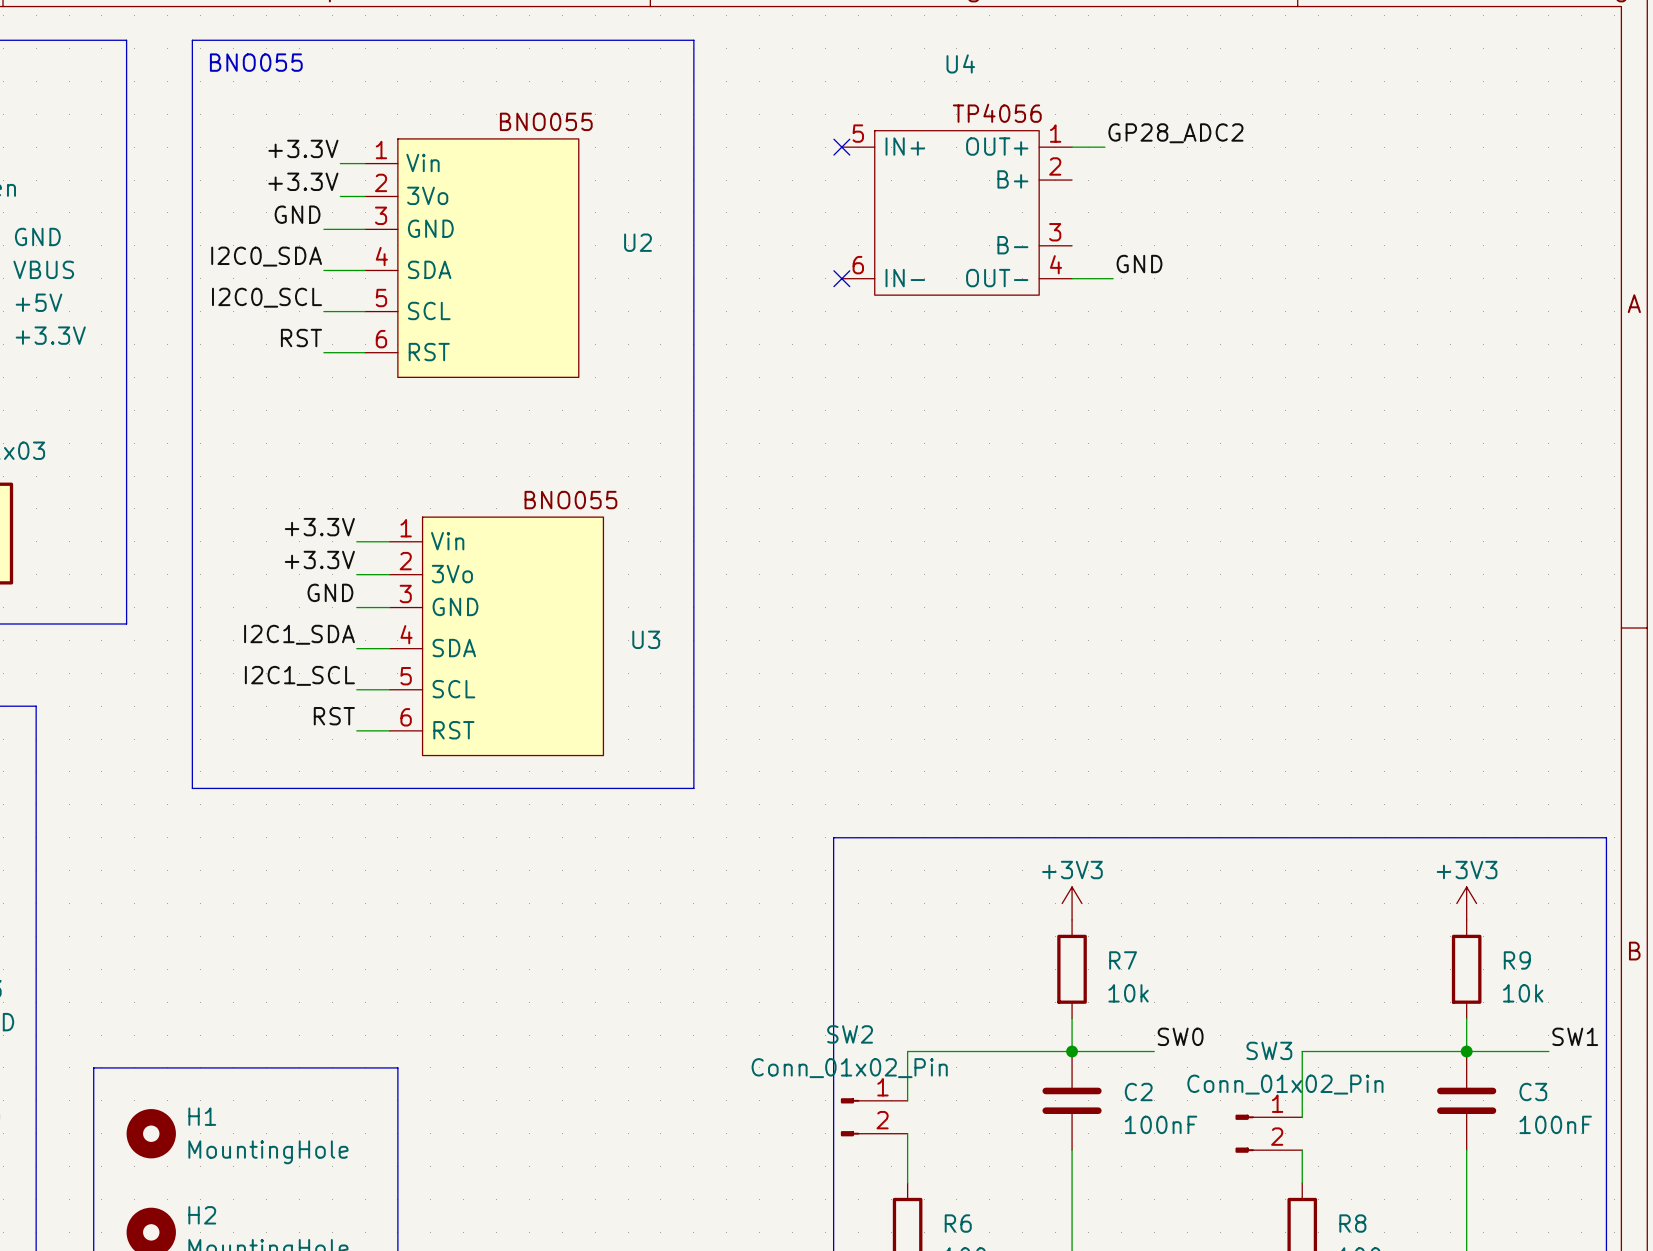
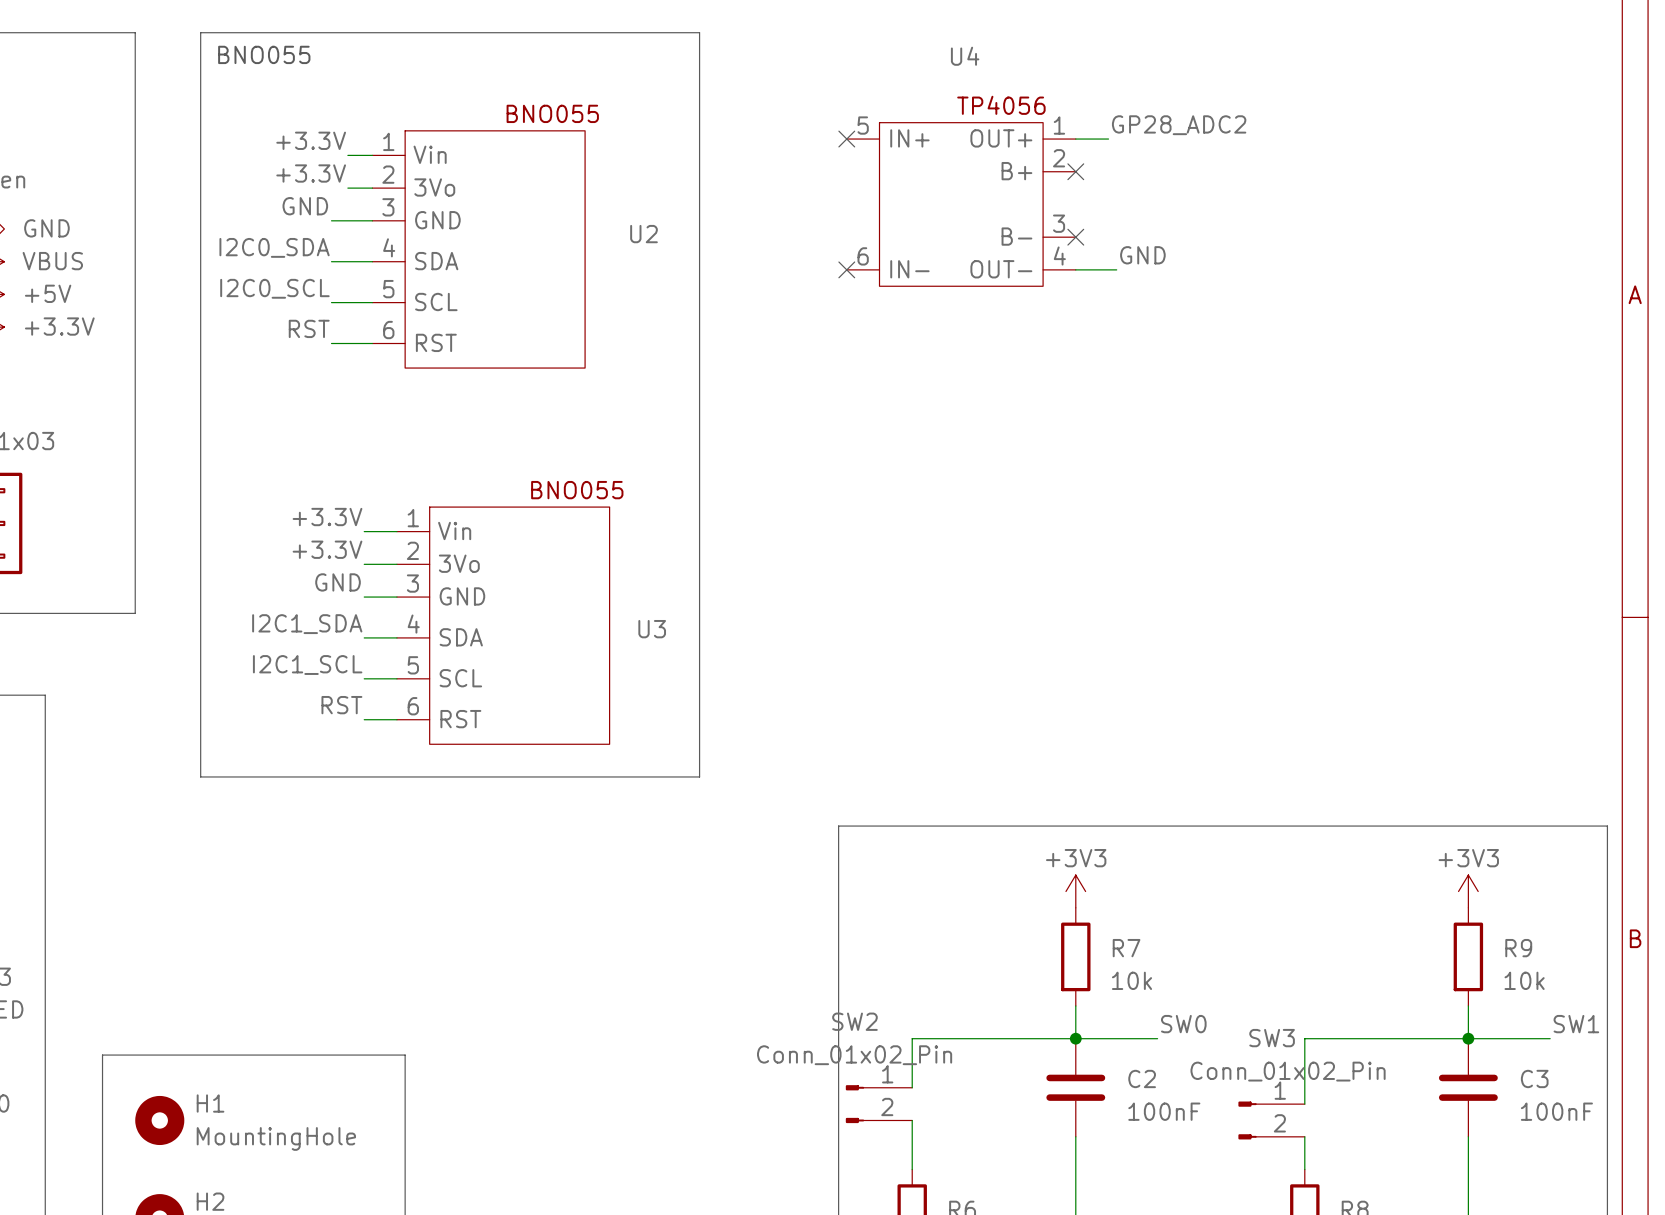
no-connect mark: none -> (1075, 171)
no-connect mark: none -> (1075, 237)

